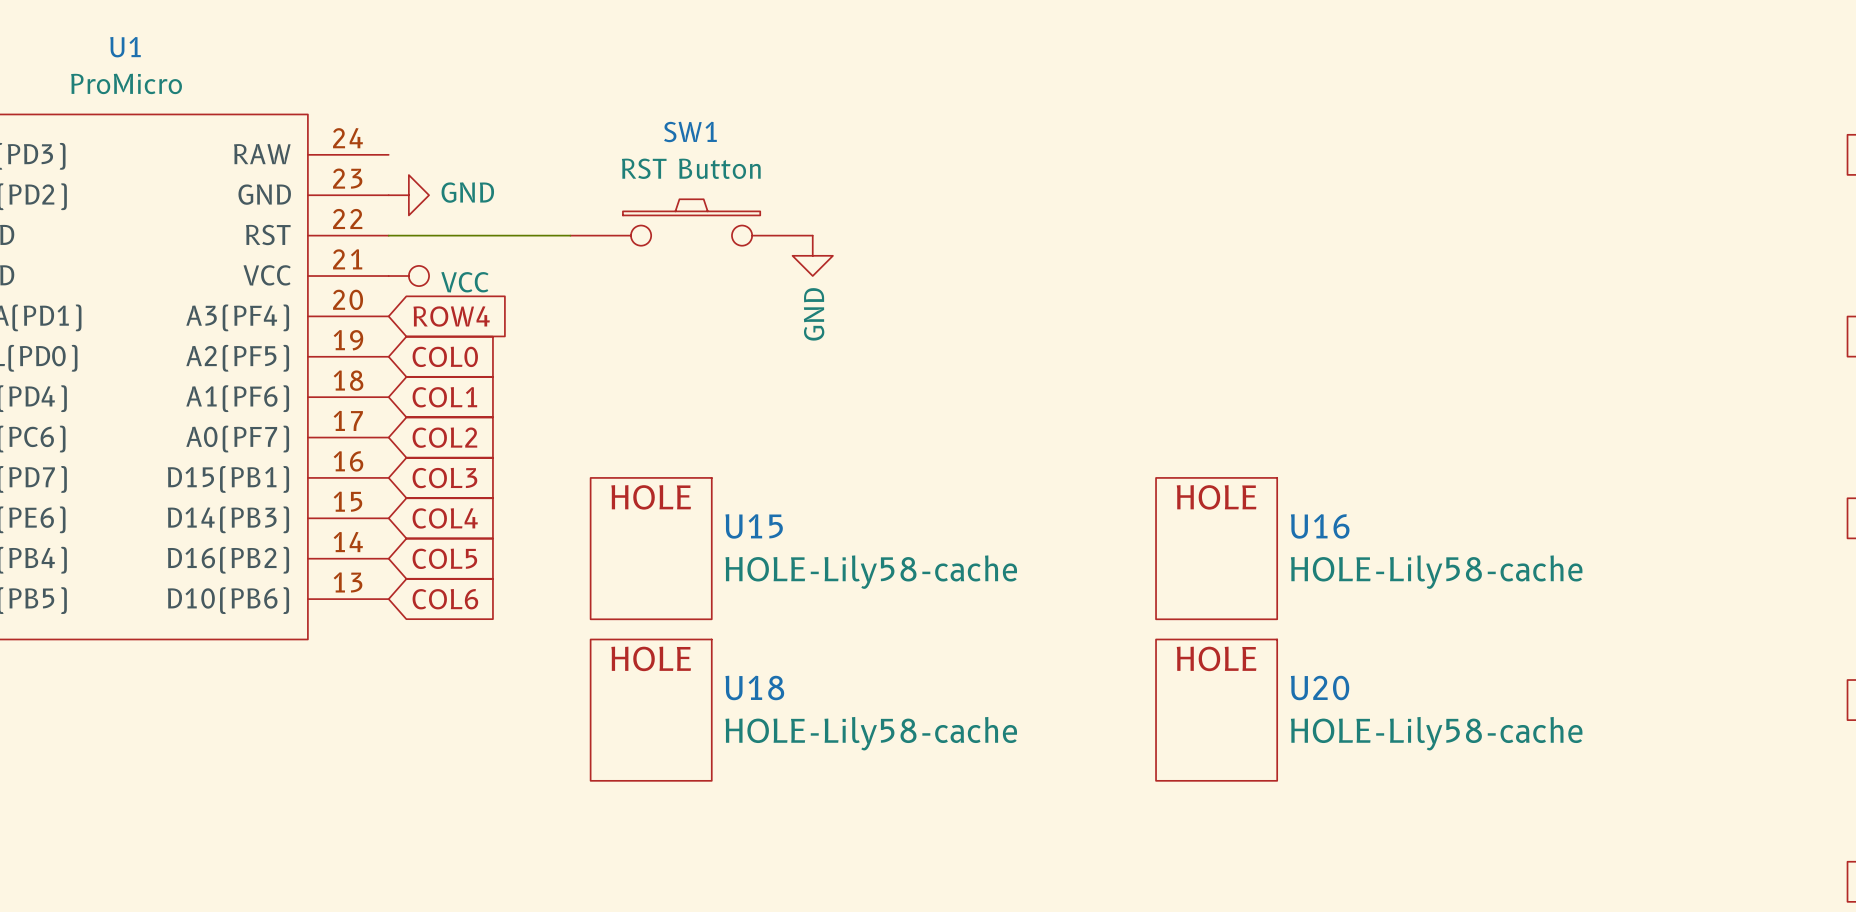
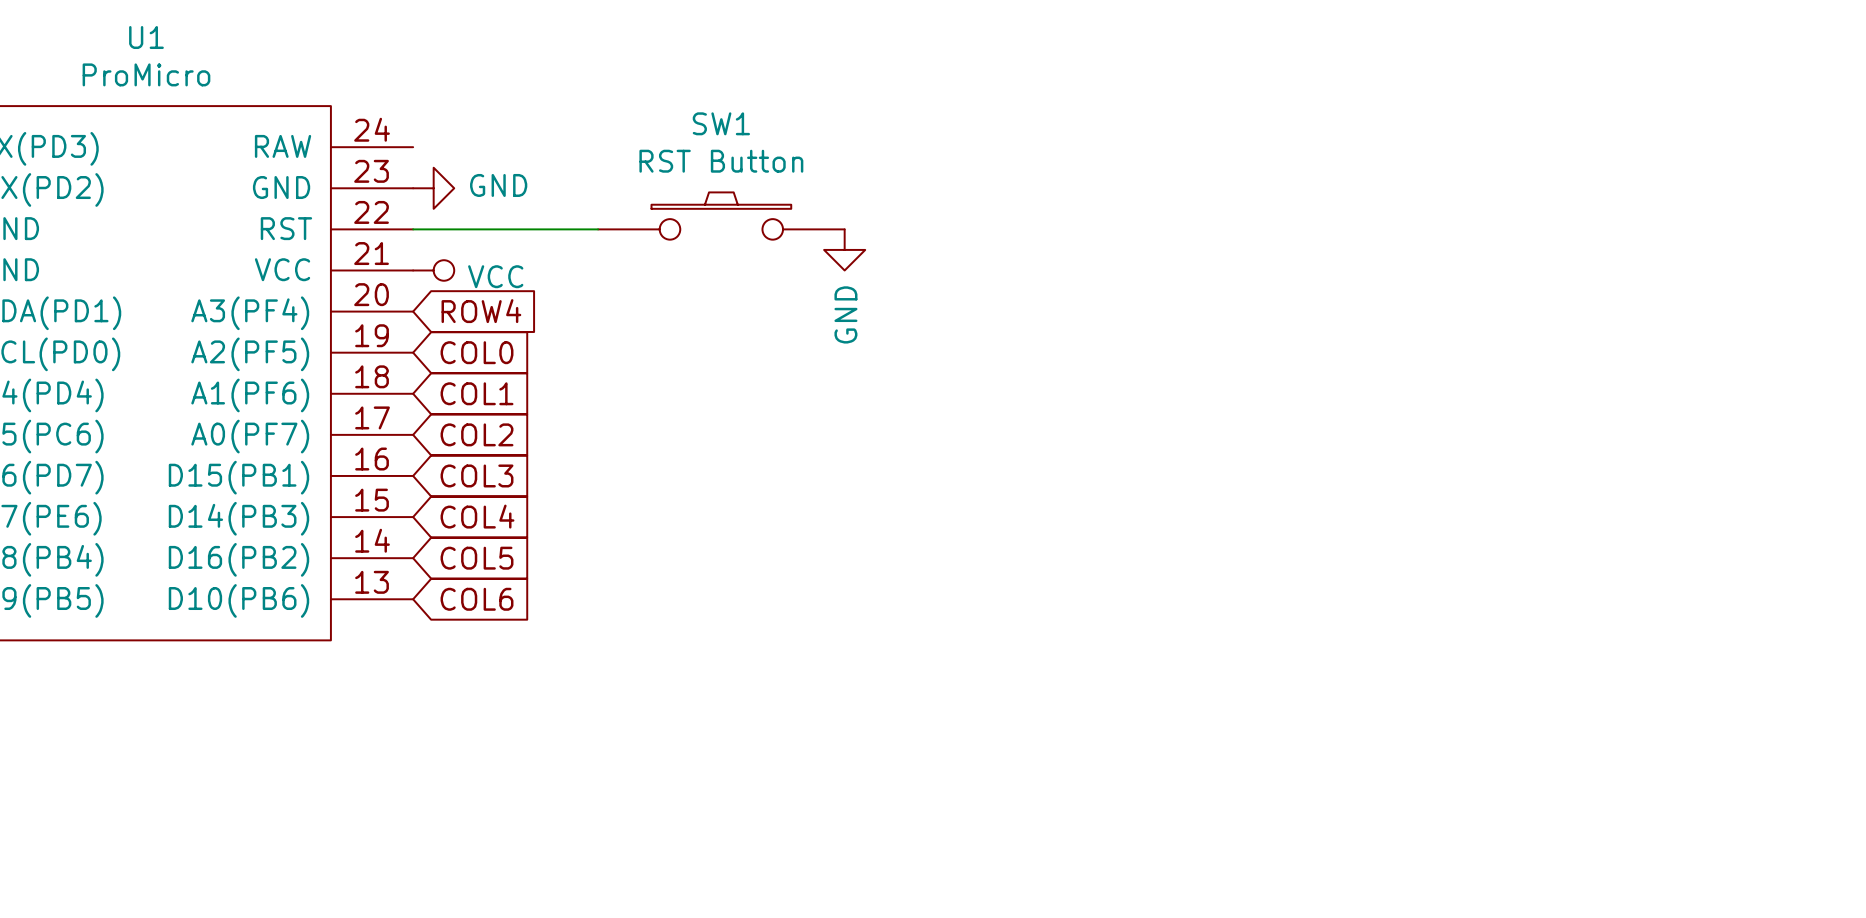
U15: HOLE-Lily58-cache (651, 548) -> none
U16: HOLE-Lily58-cache (1216, 548) -> none
U18: HOLE-Lily58-cache (651, 710) -> none
U20: HOLE-Lily58-cache (1216, 710) -> none

